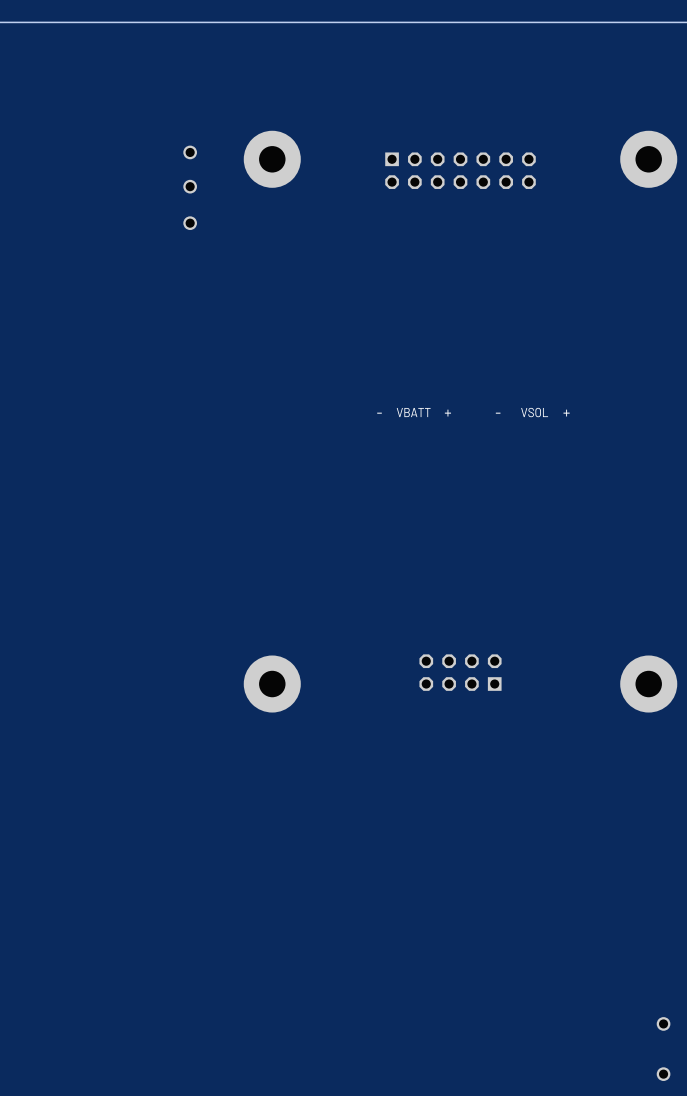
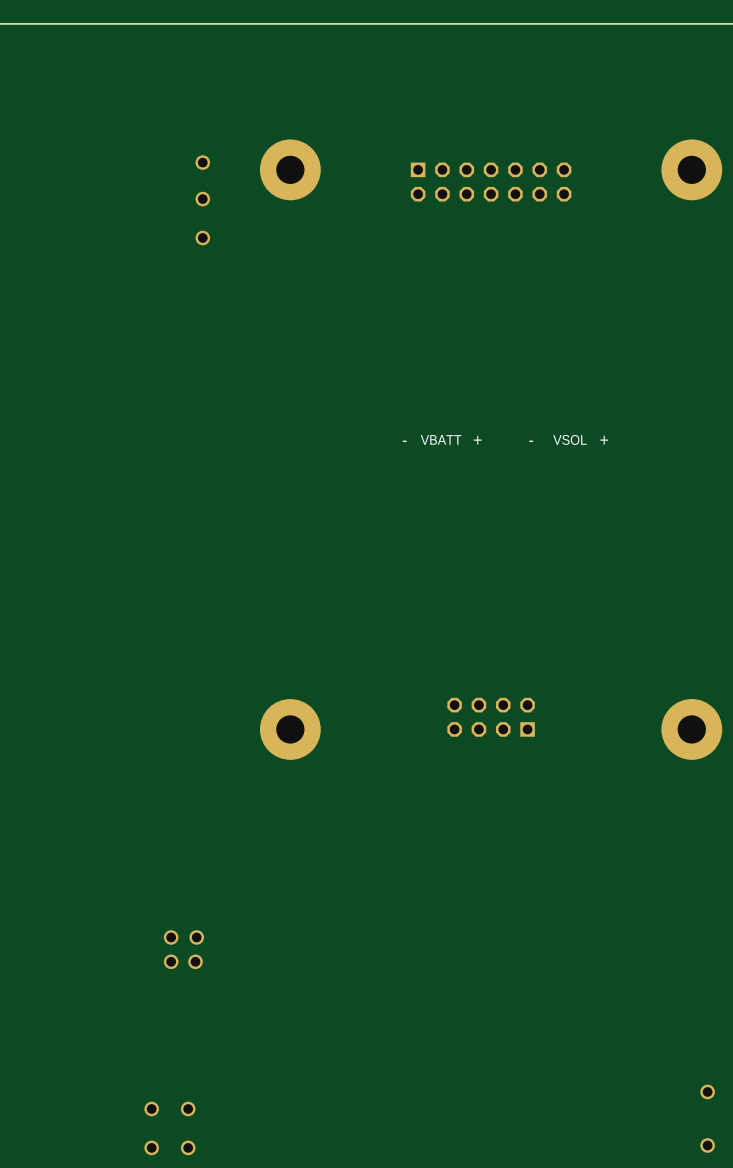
part: none -> (171, 937)
part: none -> (196, 937)
part: none -> (171, 961)
part: none -> (195, 961)
part: none -> (151, 1108)
part: none -> (188, 1108)
part: none -> (151, 1147)
part: none -> (188, 1147)

